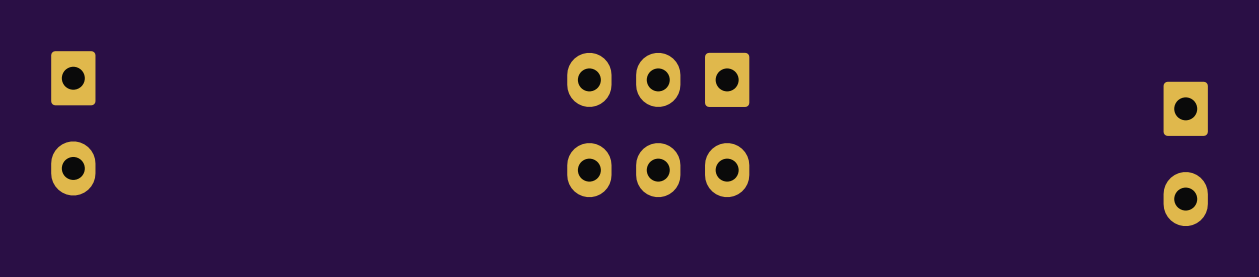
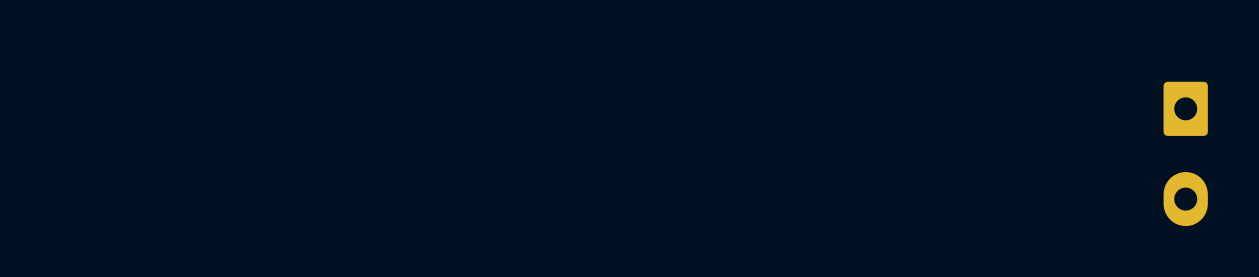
part: (73, 123) -> none
part: (658, 125) -> none

